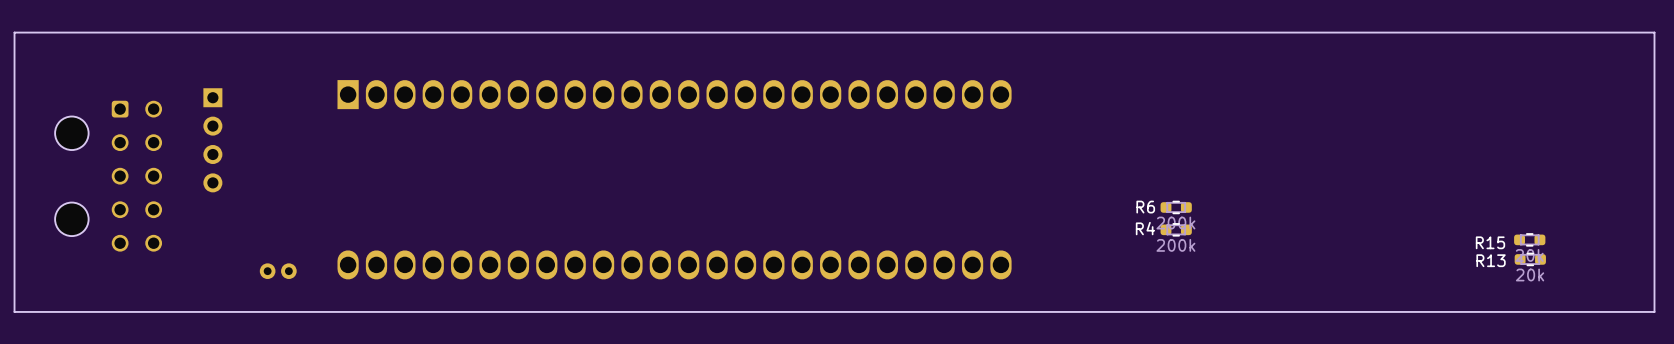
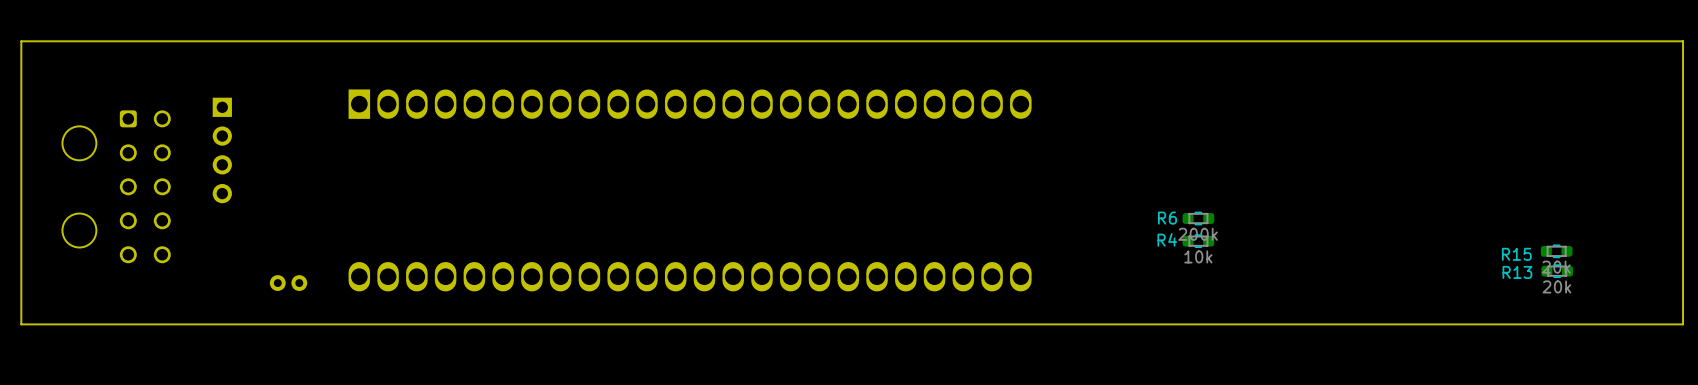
R4 value: 200k (1175, 245) -> 10k (1198, 256)

